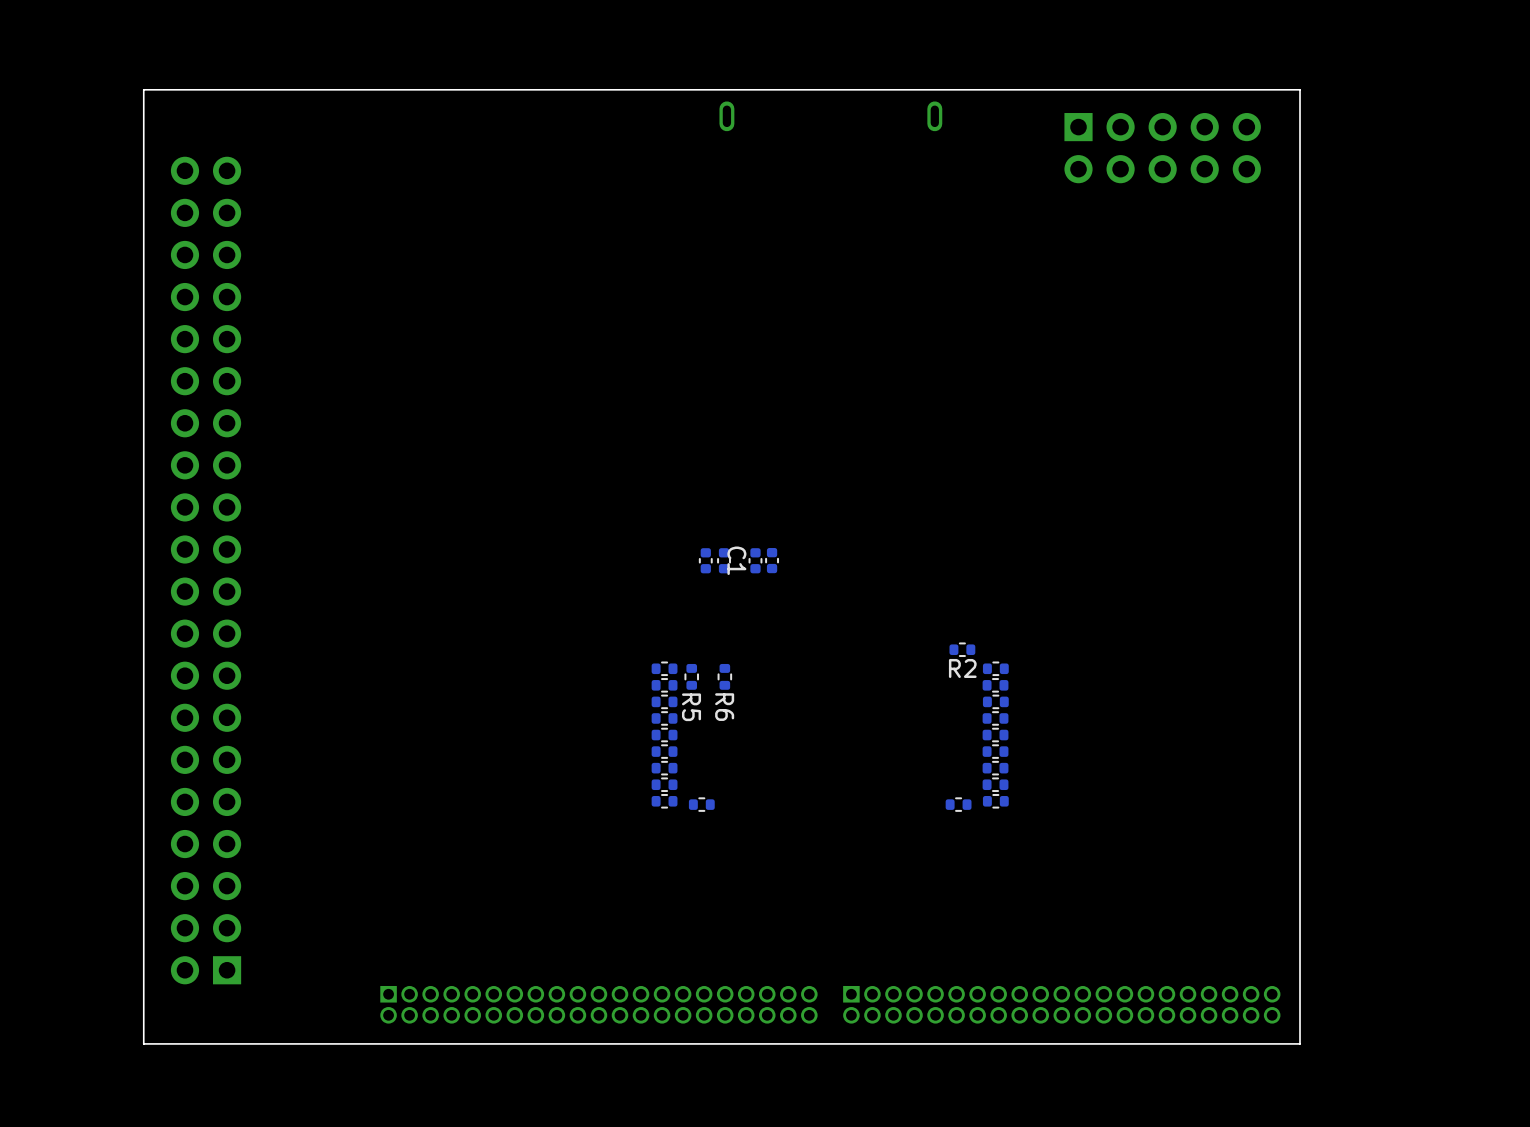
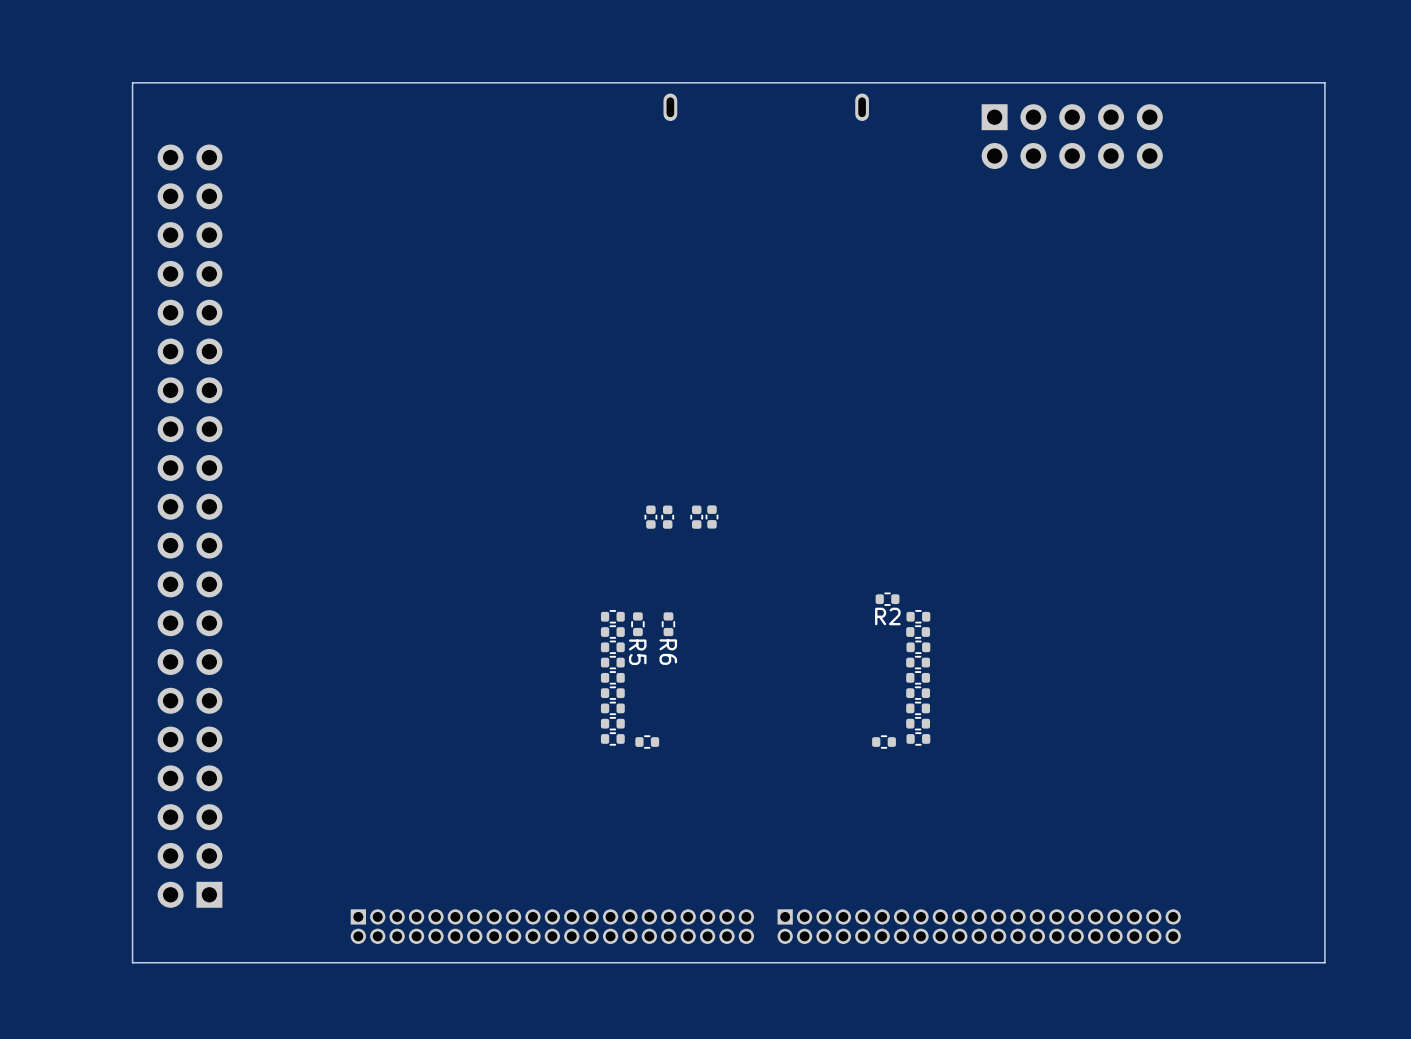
board edge: (1300, 89) (1300, 1043) -> (1198, 82) (1324, 82) (1324, 962) (1198, 962)
C1 name: C1 (736, 560) -> none

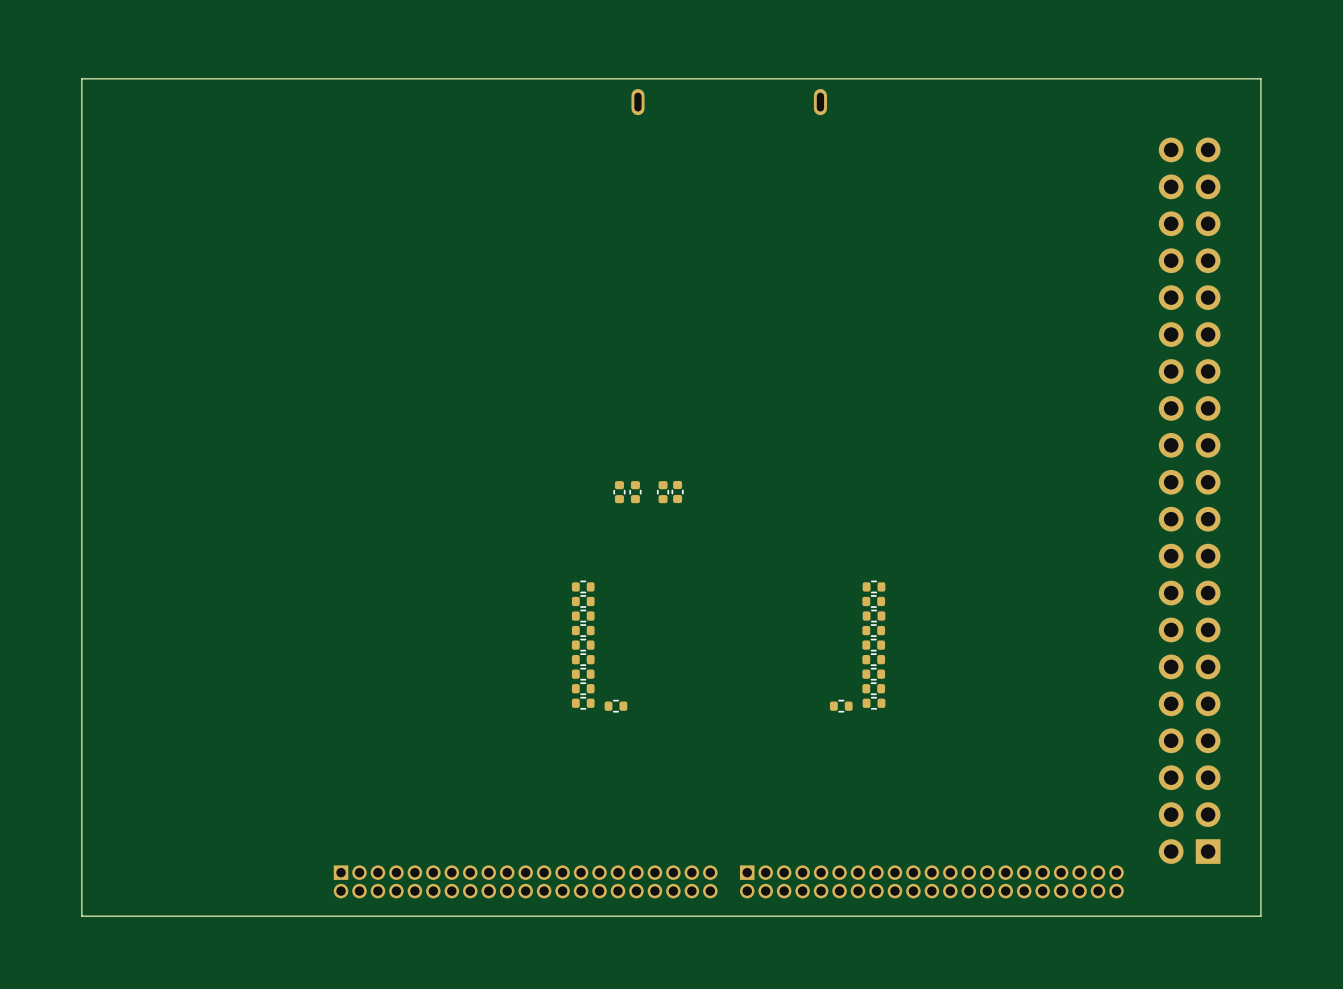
board edge: (132, 82) (132, 962) -> (126, 78) (81, 78) (81, 916) (126, 916)
part: (1072, 136) -> none
part: (190, 526) -> none
part: none -> (1189, 500)
R2: (887, 599) -> none
R5: (637, 624) -> none
R6: (668, 624) -> none

